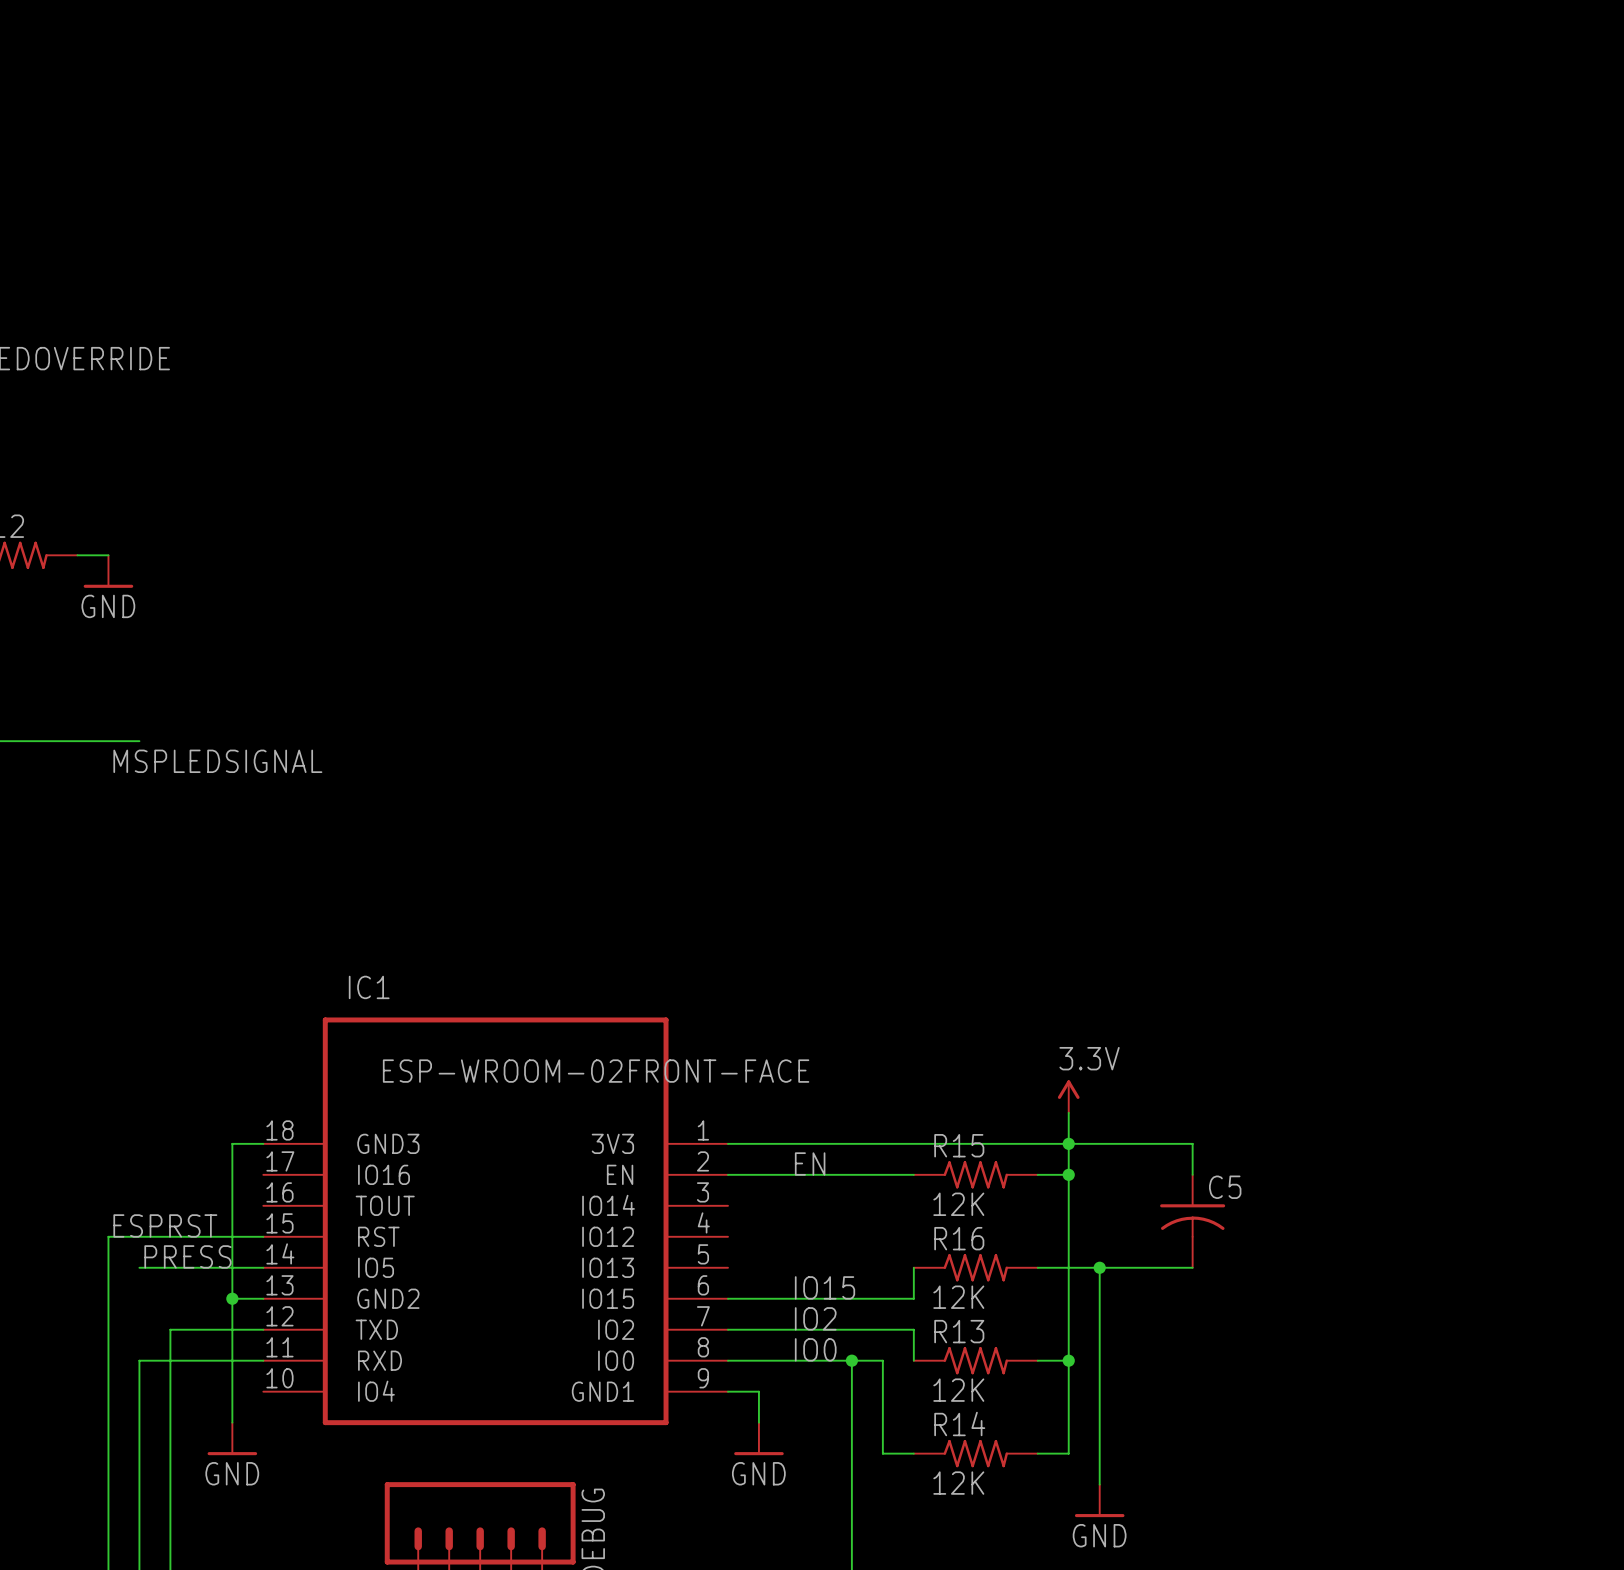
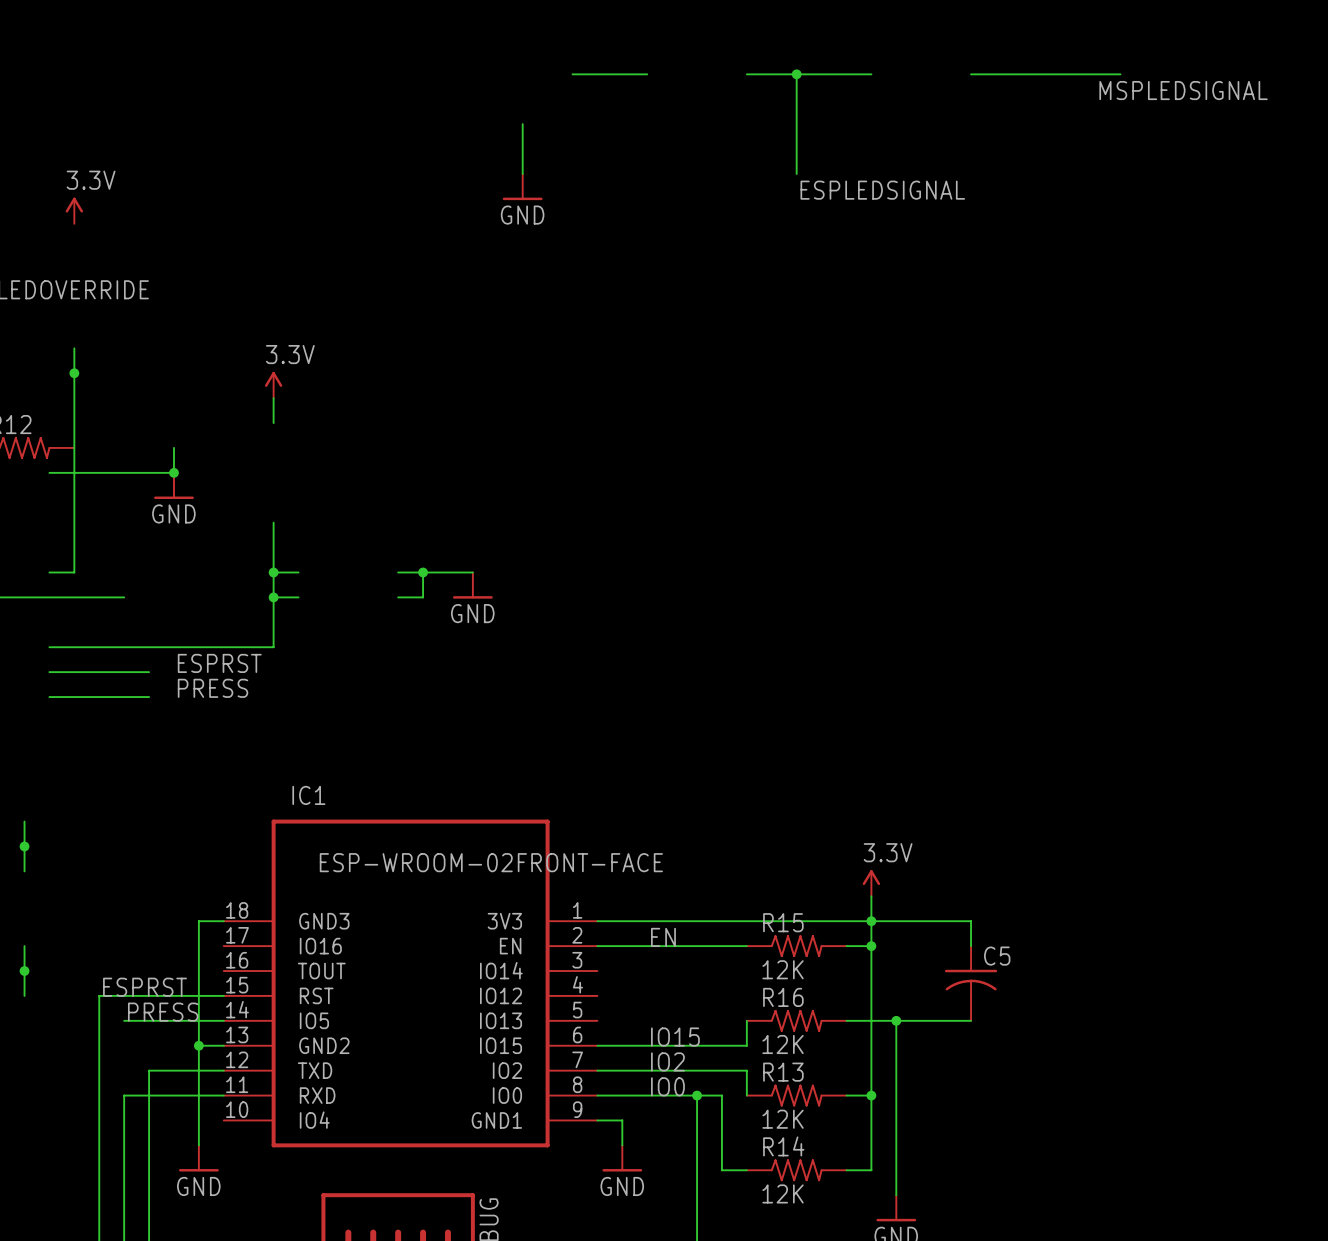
wire: none -> (572, 74) (647, 74)
wire: none -> (746, 74) (871, 74)
wire: none -> (796, 74) (796, 173)
junction: none -> (796, 74)
wire: none -> (971, 74) (1120, 74)
label: none -> MSPLEDSIGNAL (1183, 90)
wire: none -> (522, 124) (522, 173)
power symbol: none -> GND (522, 187)
label: none -> ESPLEDSIGNAL (882, 190)
power symbol: none -> 3.3V (74, 210)
wire: none -> (74, 348) (74, 572) (49, 572)
junction: none -> (74, 373)
power symbol: none -> 3.3V (273, 385)
wire: none -> (273, 398) (273, 423)
wire: (77, 555) (108, 555) -> (273, 572) (298, 572)
wire: none -> (173, 447) (173, 472) (49, 472)
power symbol position: GND (108, 571) -> GND (173, 485)
junction: none -> (173, 472)
wire: none -> (273, 522) (273, 647) (49, 647)
junction: none -> (273, 572)
wire: none -> (398, 572) (472, 572)
wire: none -> (423, 572) (423, 597) (398, 597)
junction: none -> (423, 572)
power symbol: none -> GND (472, 585)
wire: none -> (273, 597) (298, 597)
junction: none -> (273, 597)
label: MSPLEDSIGNAL (217, 761) -> none
label: none -> ESPRST (219, 663)
wire: none -> (49, 672) (149, 672)
label: none -> PRESS (213, 688)
wire: none -> (49, 697) (149, 697)
wire: none -> (24, 821) (24, 871)
junction: none -> (24, 846)
wire: none -> (24, 946) (24, 995)
junction: none -> (24, 971)

